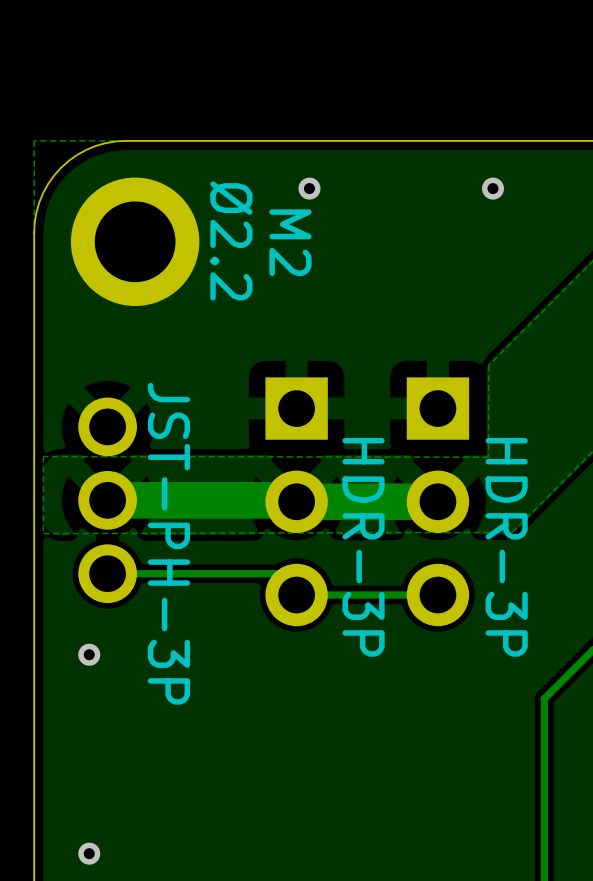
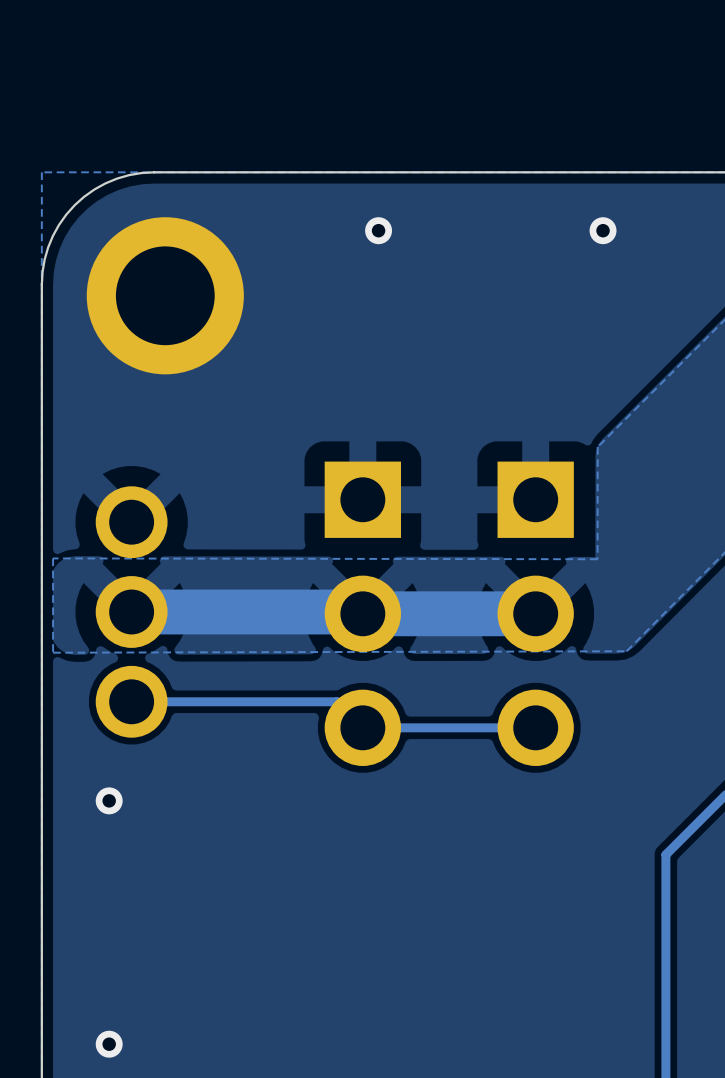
text: Ø2.2 (231, 240) -> none
text: M2 (290, 242) -> none
text: JST-PH-3P (168, 543) -> none
text: HDR-3P (363, 547) -> none
text: HDR-3P (506, 547) -> none

